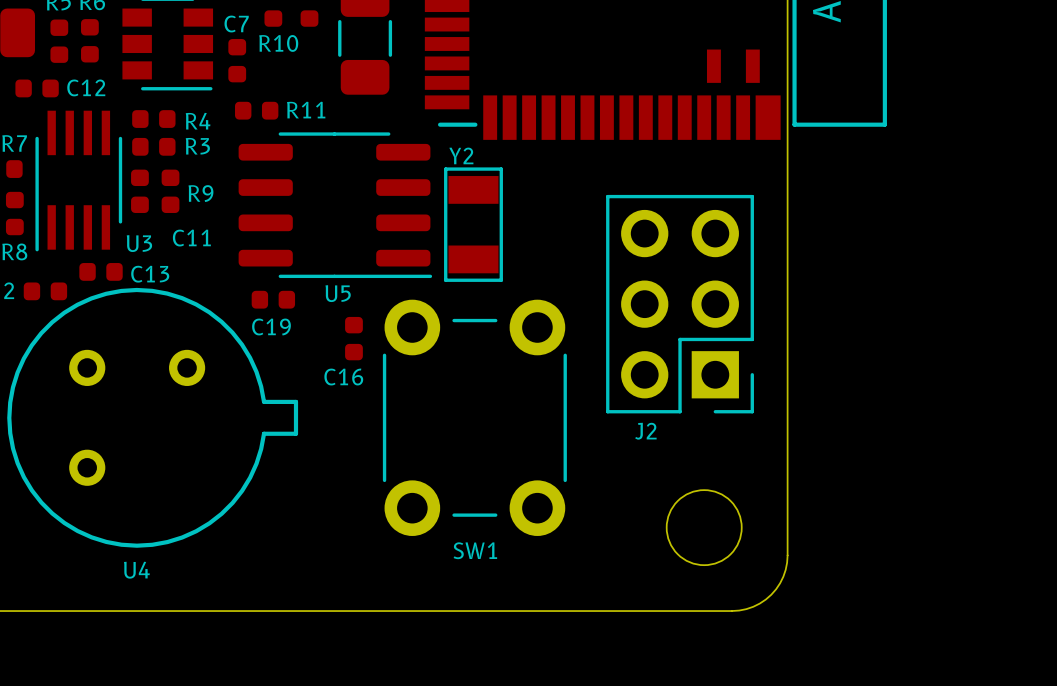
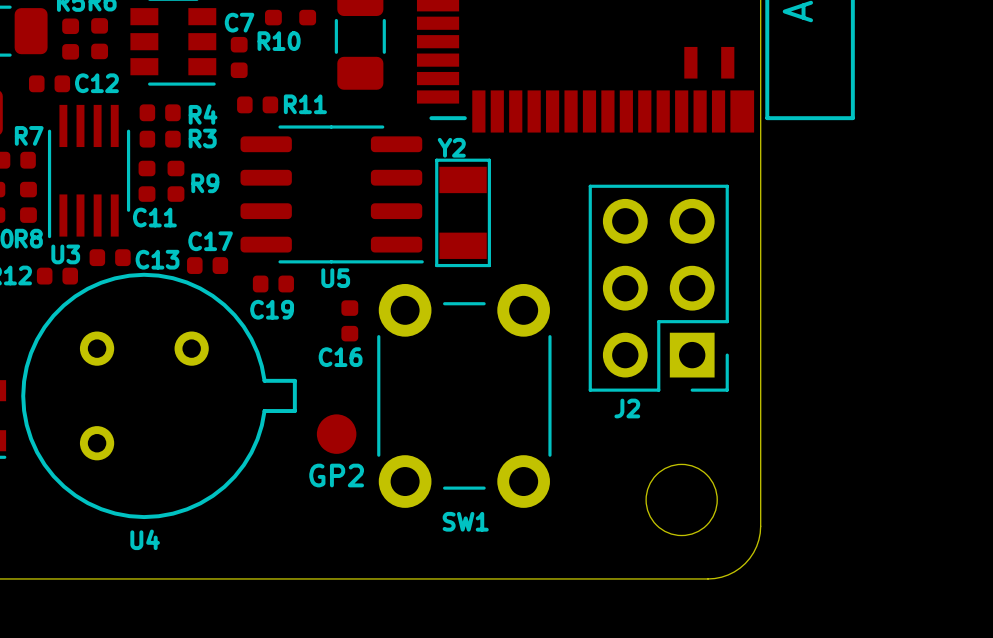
C11 name position: C11 (191, 238) -> C11 (154, 217)
U3 name position: U3 (139, 243) -> U3 (65, 254)
C17: none -> (207, 265)
GP2: none -> (336, 434)

